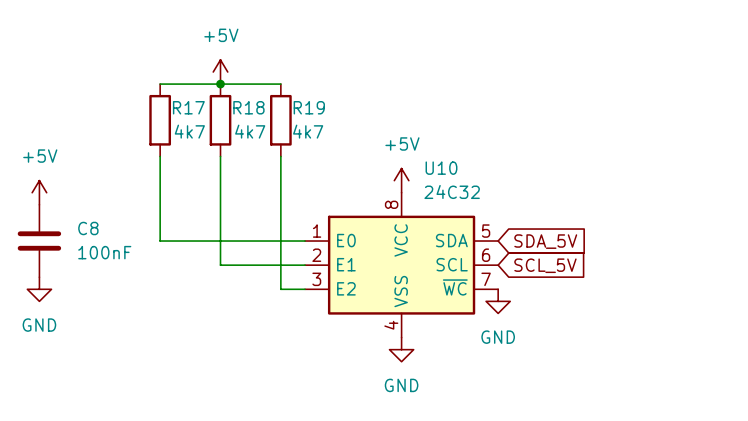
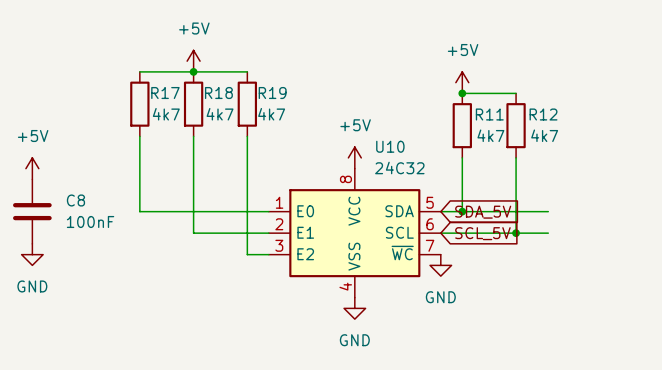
power symbol: none -> +5V (462, 82)
wire: none -> (462, 93) (516, 93)
junction: none -> (462, 93)
R11: none -> 4k7 (462, 125)
R12: none -> 4k7 (516, 125)
wire: none -> (462, 157) (462, 211)
wire: none -> (516, 157) (516, 233)
wire: none -> (440, 211) (548, 211)
junction: none -> (462, 211)
wire: none -> (440, 233) (548, 233)
junction: none -> (516, 233)

